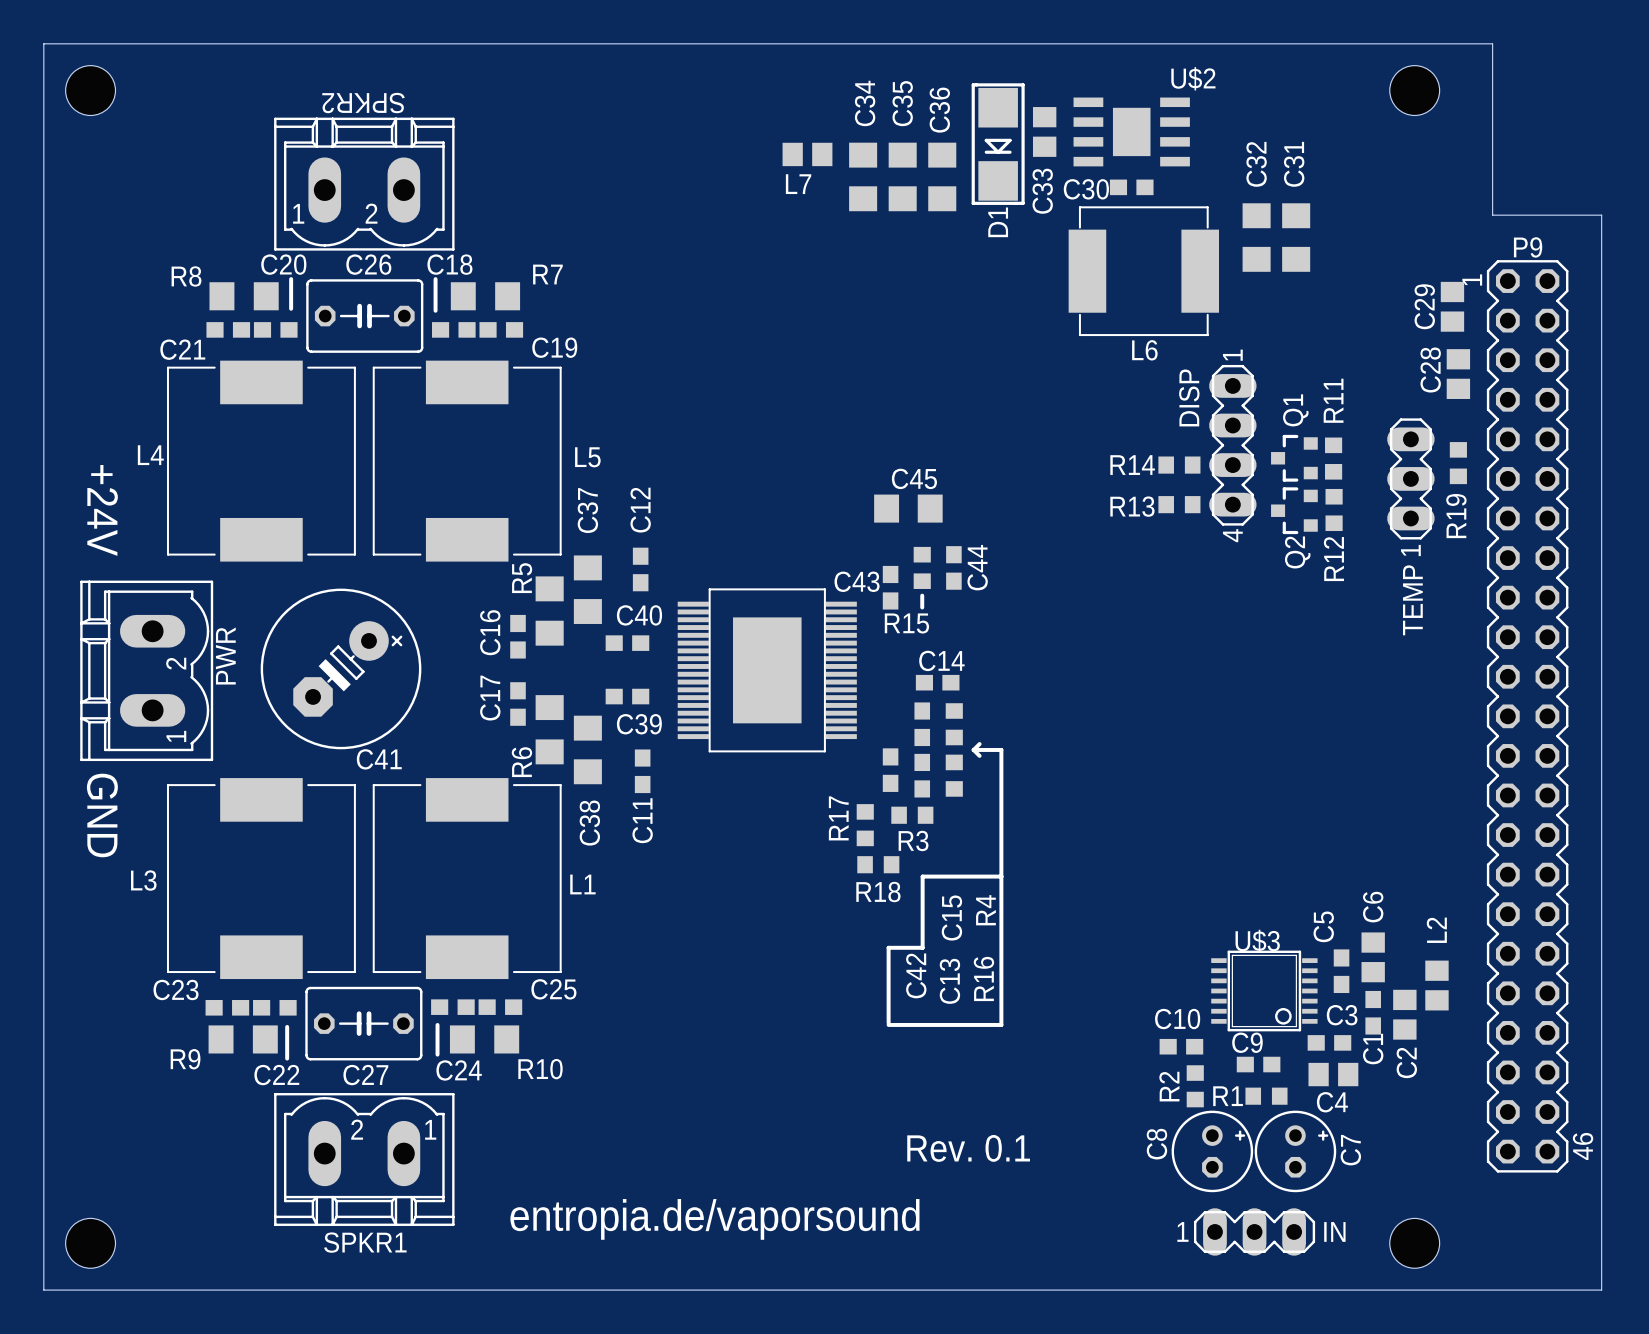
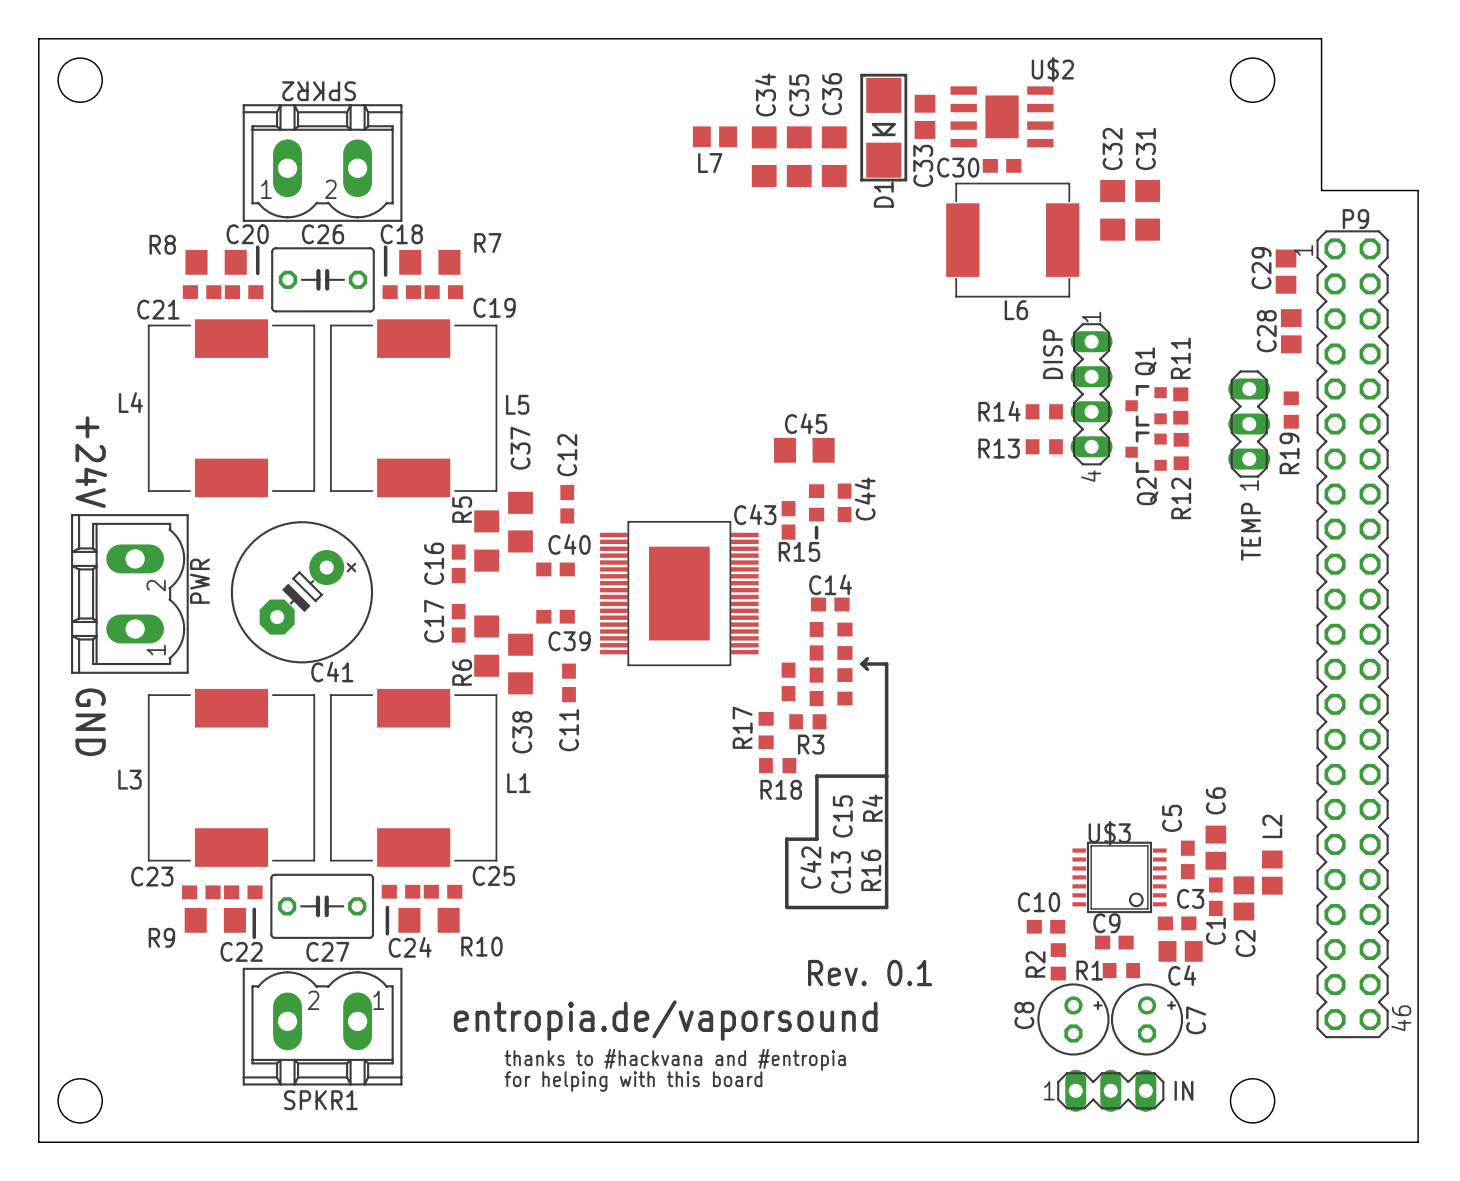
text position: Rev. 0.1 (968, 1148) -> Rev. 0.1 (870, 973)
text: none -> thanks to #hackvana and #entropia (675, 1059)
text position: entropia.de/vaporsound (715, 1219) -> entropia.de/vaporsound (665, 1020)
text: none -> for helping with this board (633, 1081)

